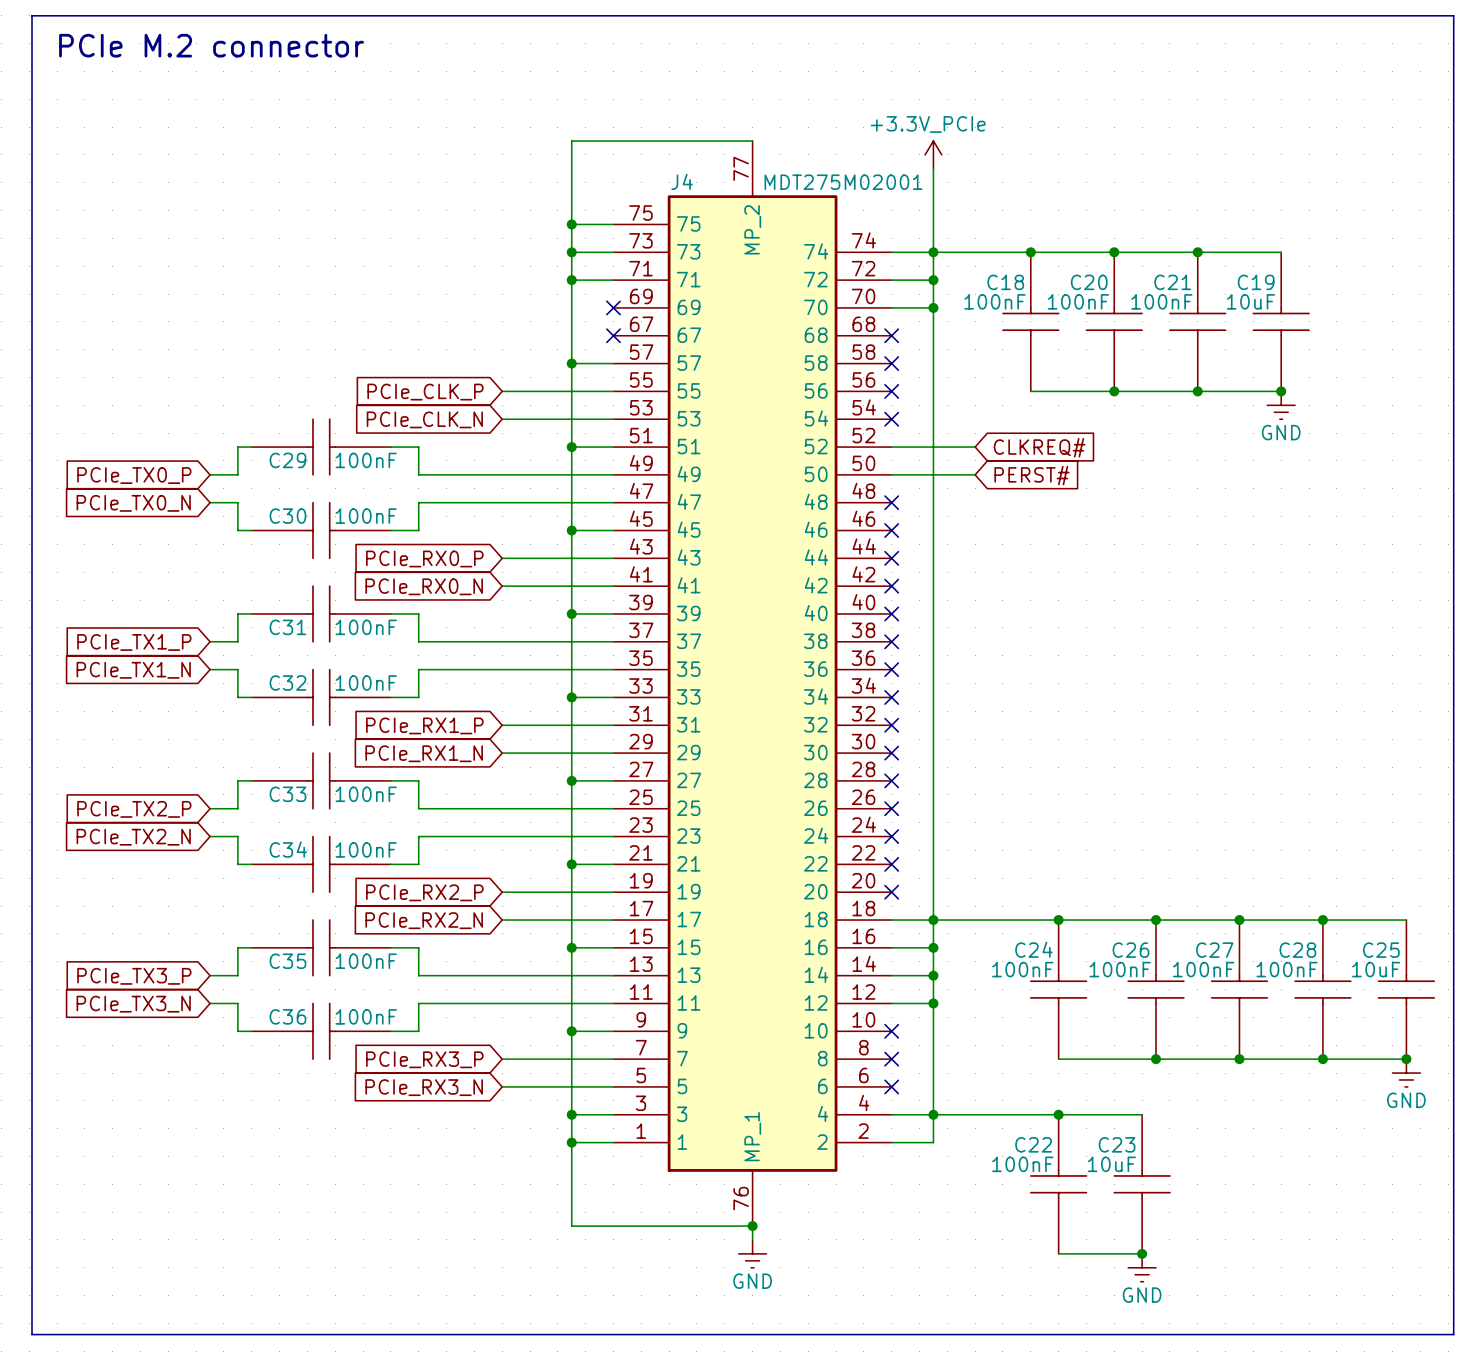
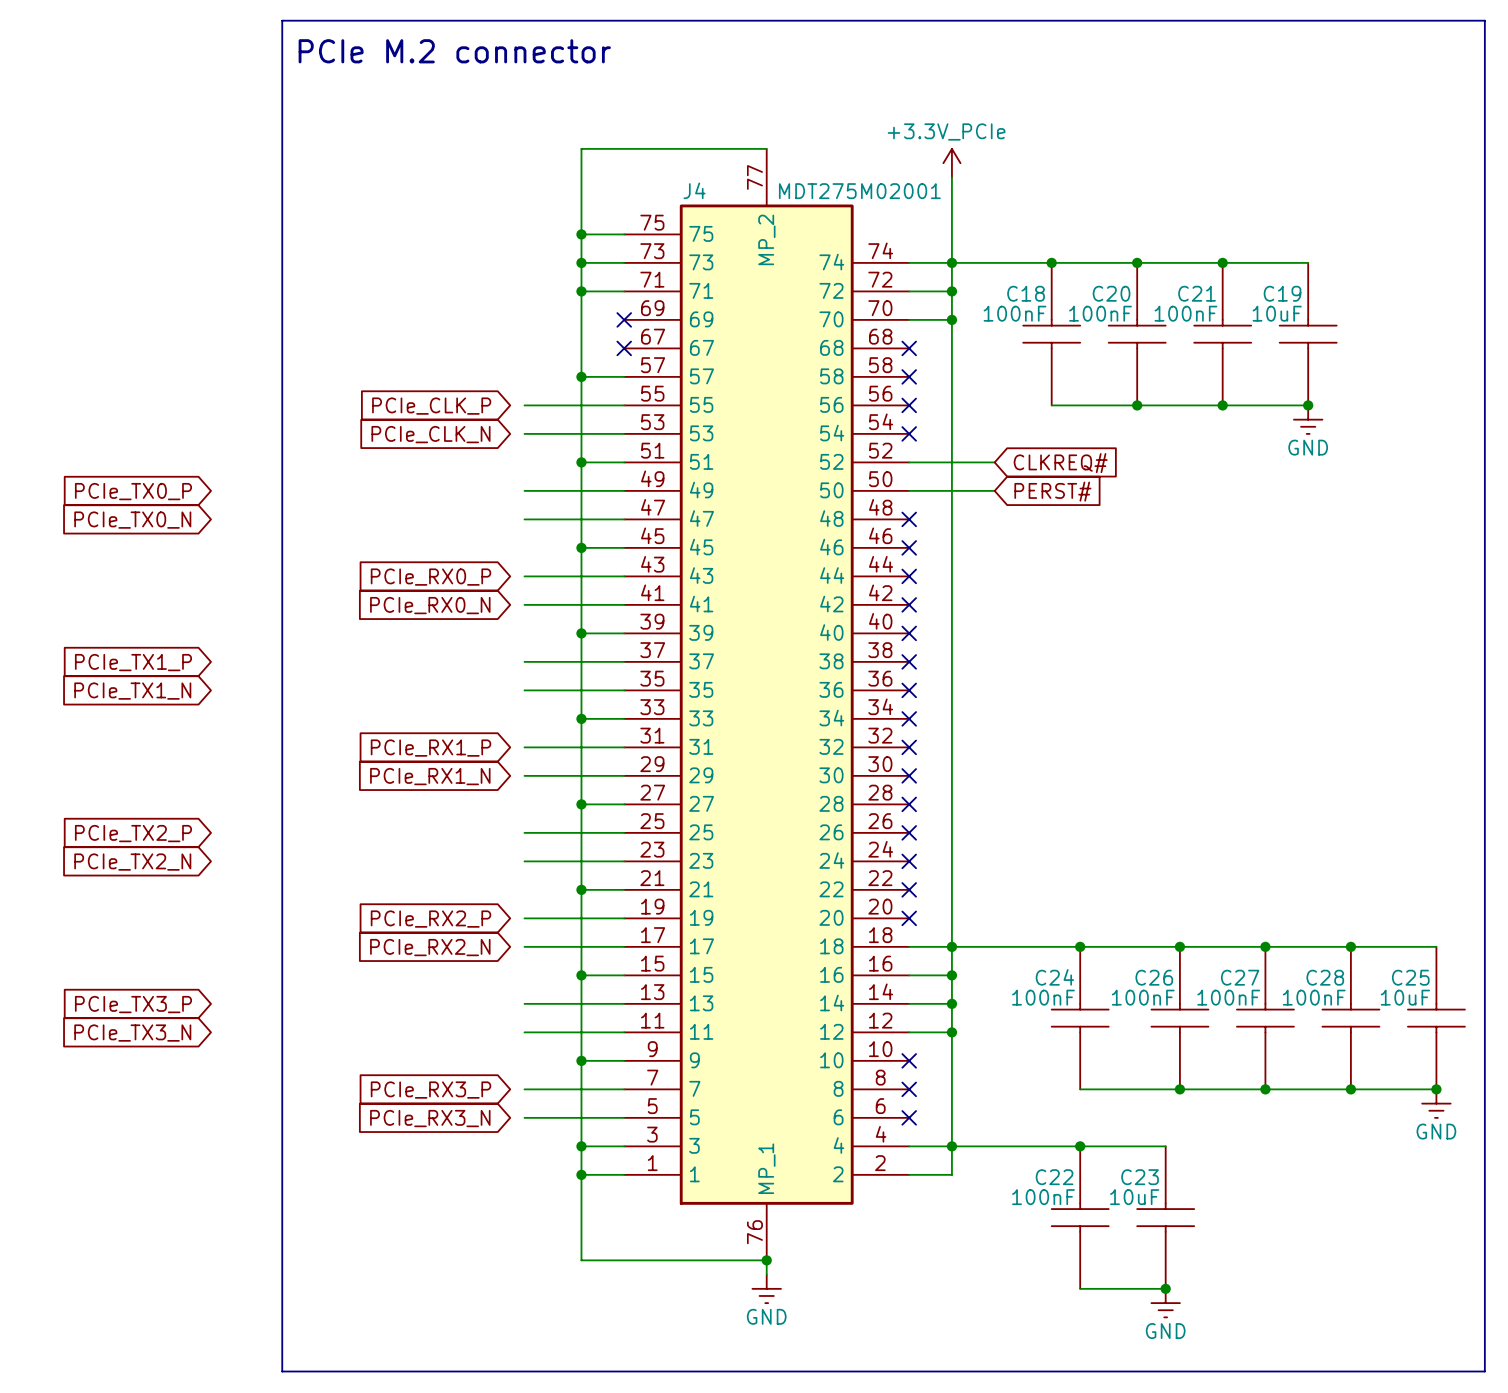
line: (279, 15) (32, 15) (32, 1334) (279, 1334) -> (282, 20) (282, 1371)
text position: PCIe M.2 connector (211, 45) -> PCIe M.2 connector (454, 51)
wire: (502, 391) (516, 391) -> none
wire: (502, 419) (516, 419) -> none
wire: (251, 447) (237, 447) (237, 474) (210, 474) -> none
C29: 100nF (321, 447) -> none
wire: (390, 447) (418, 447) (418, 474) (516, 474) -> none
wire: (210, 502) (237, 502) (237, 530) (251, 530) -> none
wire: (516, 502) (418, 502) (418, 530) (390, 530) -> none
C30: 100nF (321, 530) -> none
wire: (502, 558) (516, 558) -> none
wire: (502, 586) (516, 586) -> none
wire: (251, 613) (237, 613) (237, 641) (210, 641) -> none
C31: 100nF (321, 613) -> none
wire: (390, 613) (418, 613) (418, 641) (516, 641) -> none
wire: (210, 669) (237, 669) (237, 697) (251, 697) -> none
wire: (516, 669) (418, 669) (418, 697) (390, 697) -> none
C32: 100nF (321, 697) -> none
wire: (502, 725) (516, 725) -> none
wire: (502, 753) (516, 753) -> none
wire: (251, 780) (237, 780) (237, 808) (210, 808) -> none
C33: 100nF (321, 780) -> none
wire: (390, 780) (418, 780) (418, 808) (516, 808) -> none
wire: (210, 836) (237, 836) (237, 864) (251, 864) -> none
wire: (516, 836) (418, 836) (418, 864) (390, 864) -> none
C34: 100nF (321, 864) -> none
wire: (502, 892) (516, 892) -> none
wire: (502, 920) (516, 920) -> none
wire: (251, 947) (237, 947) (237, 975) (210, 975) -> none
C35: 100nF (321, 947) -> none
wire: (390, 947) (418, 947) (418, 975) (516, 975) -> none
wire: (210, 1003) (237, 1003) (237, 1031) (251, 1031) -> none
wire: (516, 1003) (418, 1003) (418, 1031) (390, 1031) -> none
C36: 100nF (321, 1031) -> none
wire: (502, 1059) (516, 1059) -> none
wire: (502, 1086) (516, 1086) -> none

